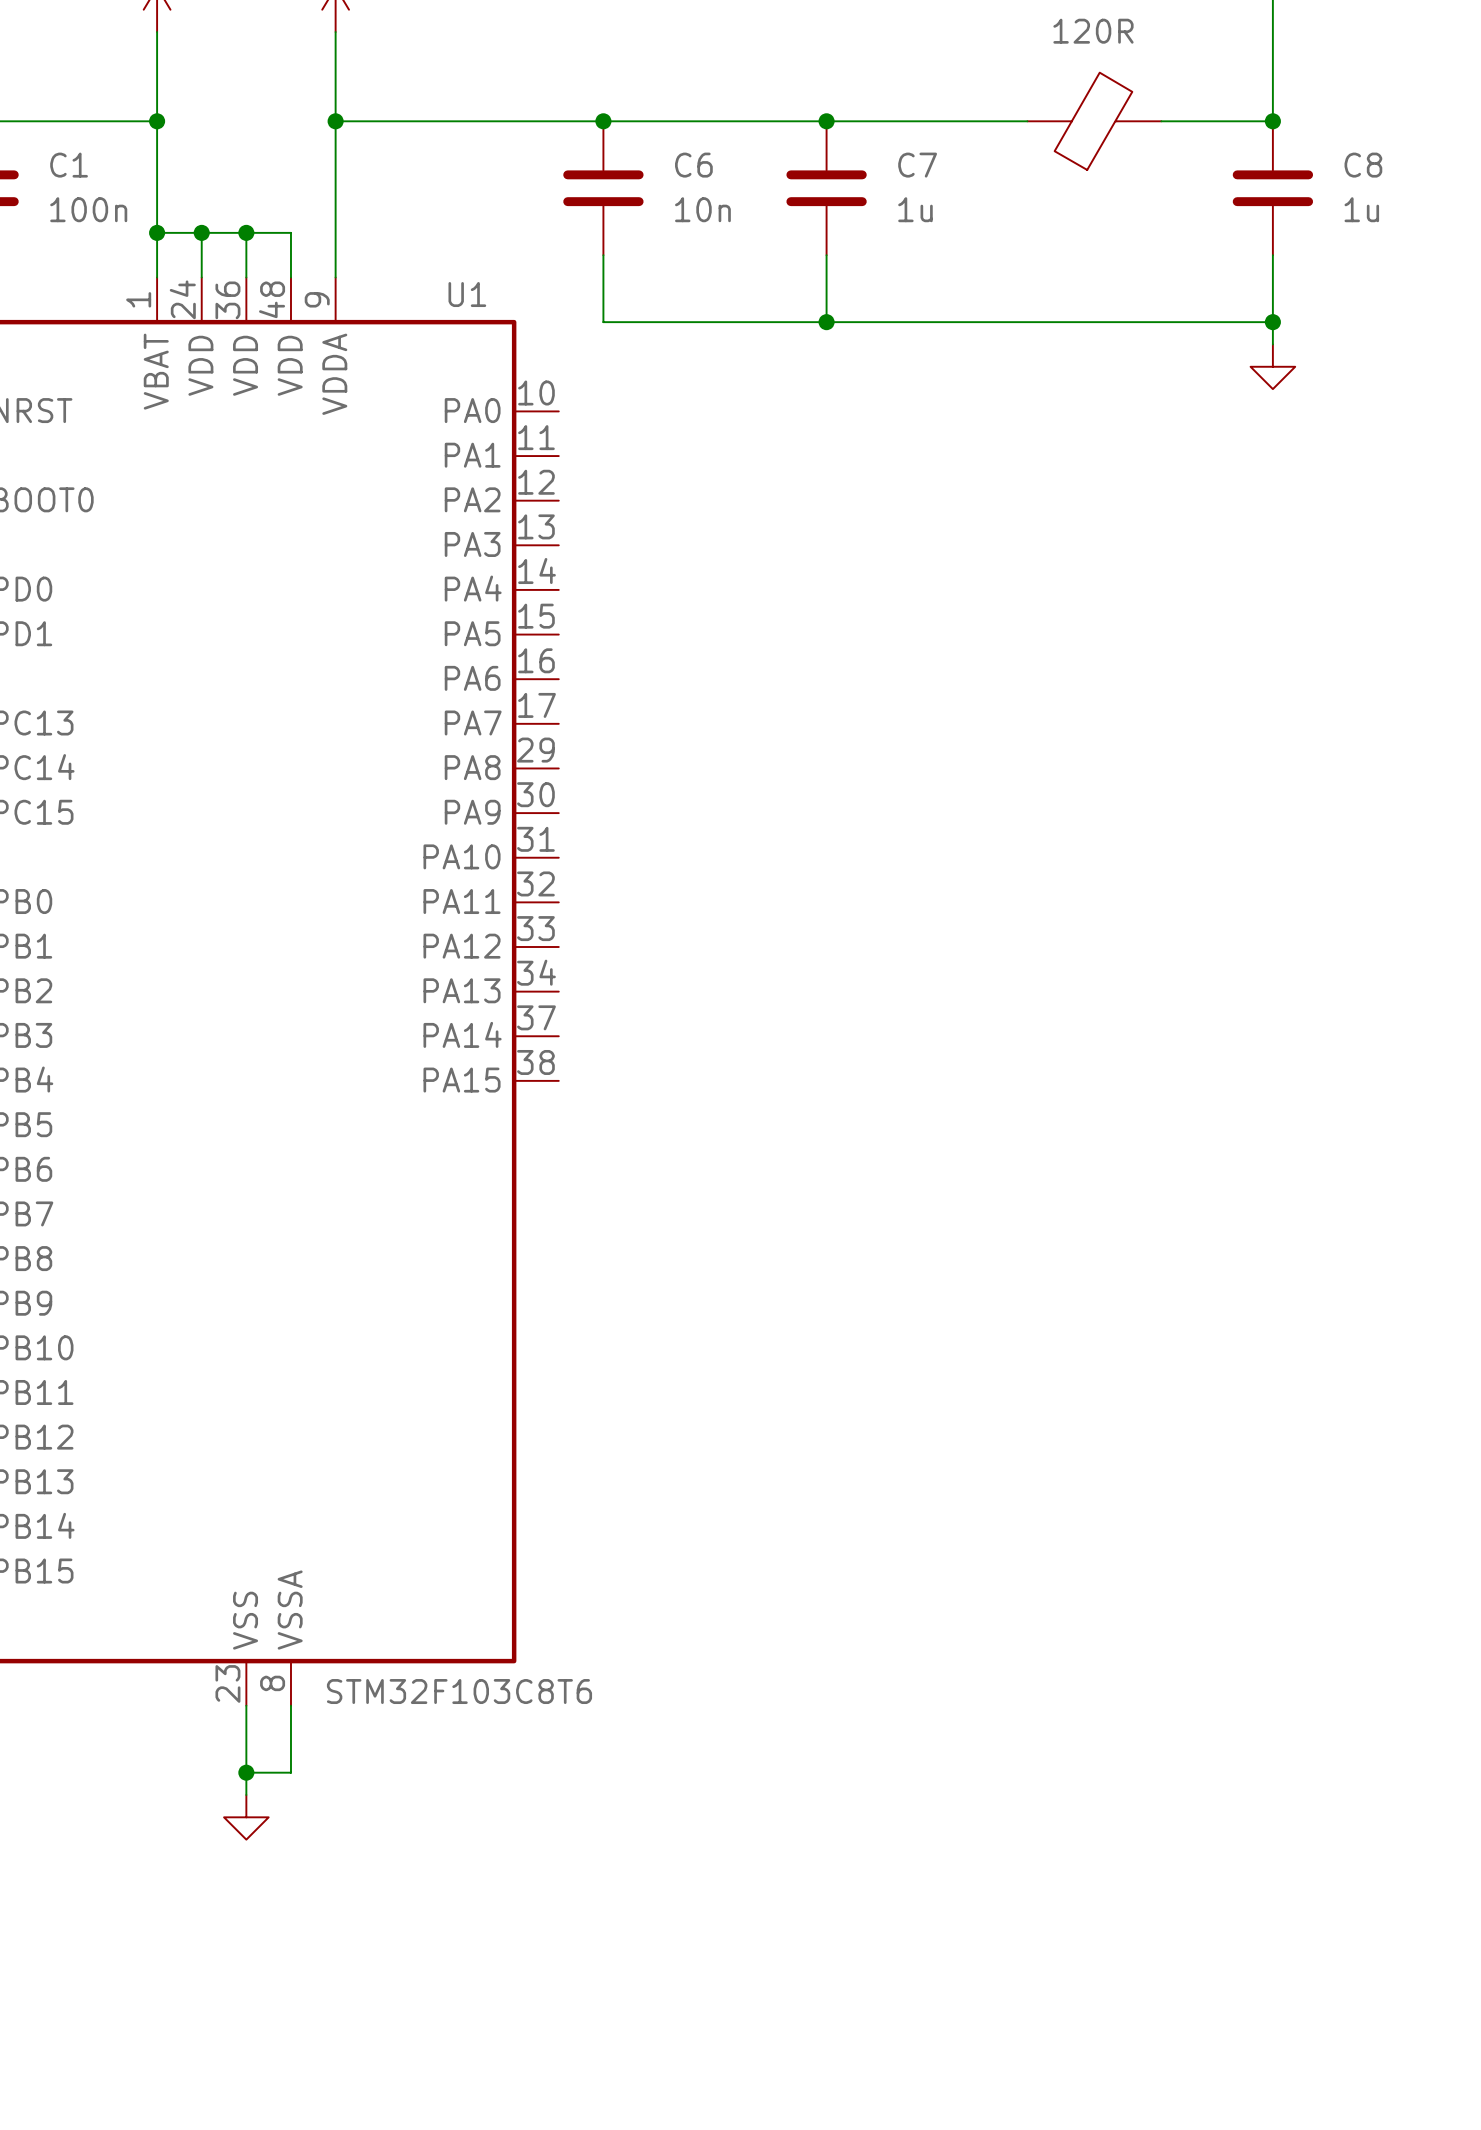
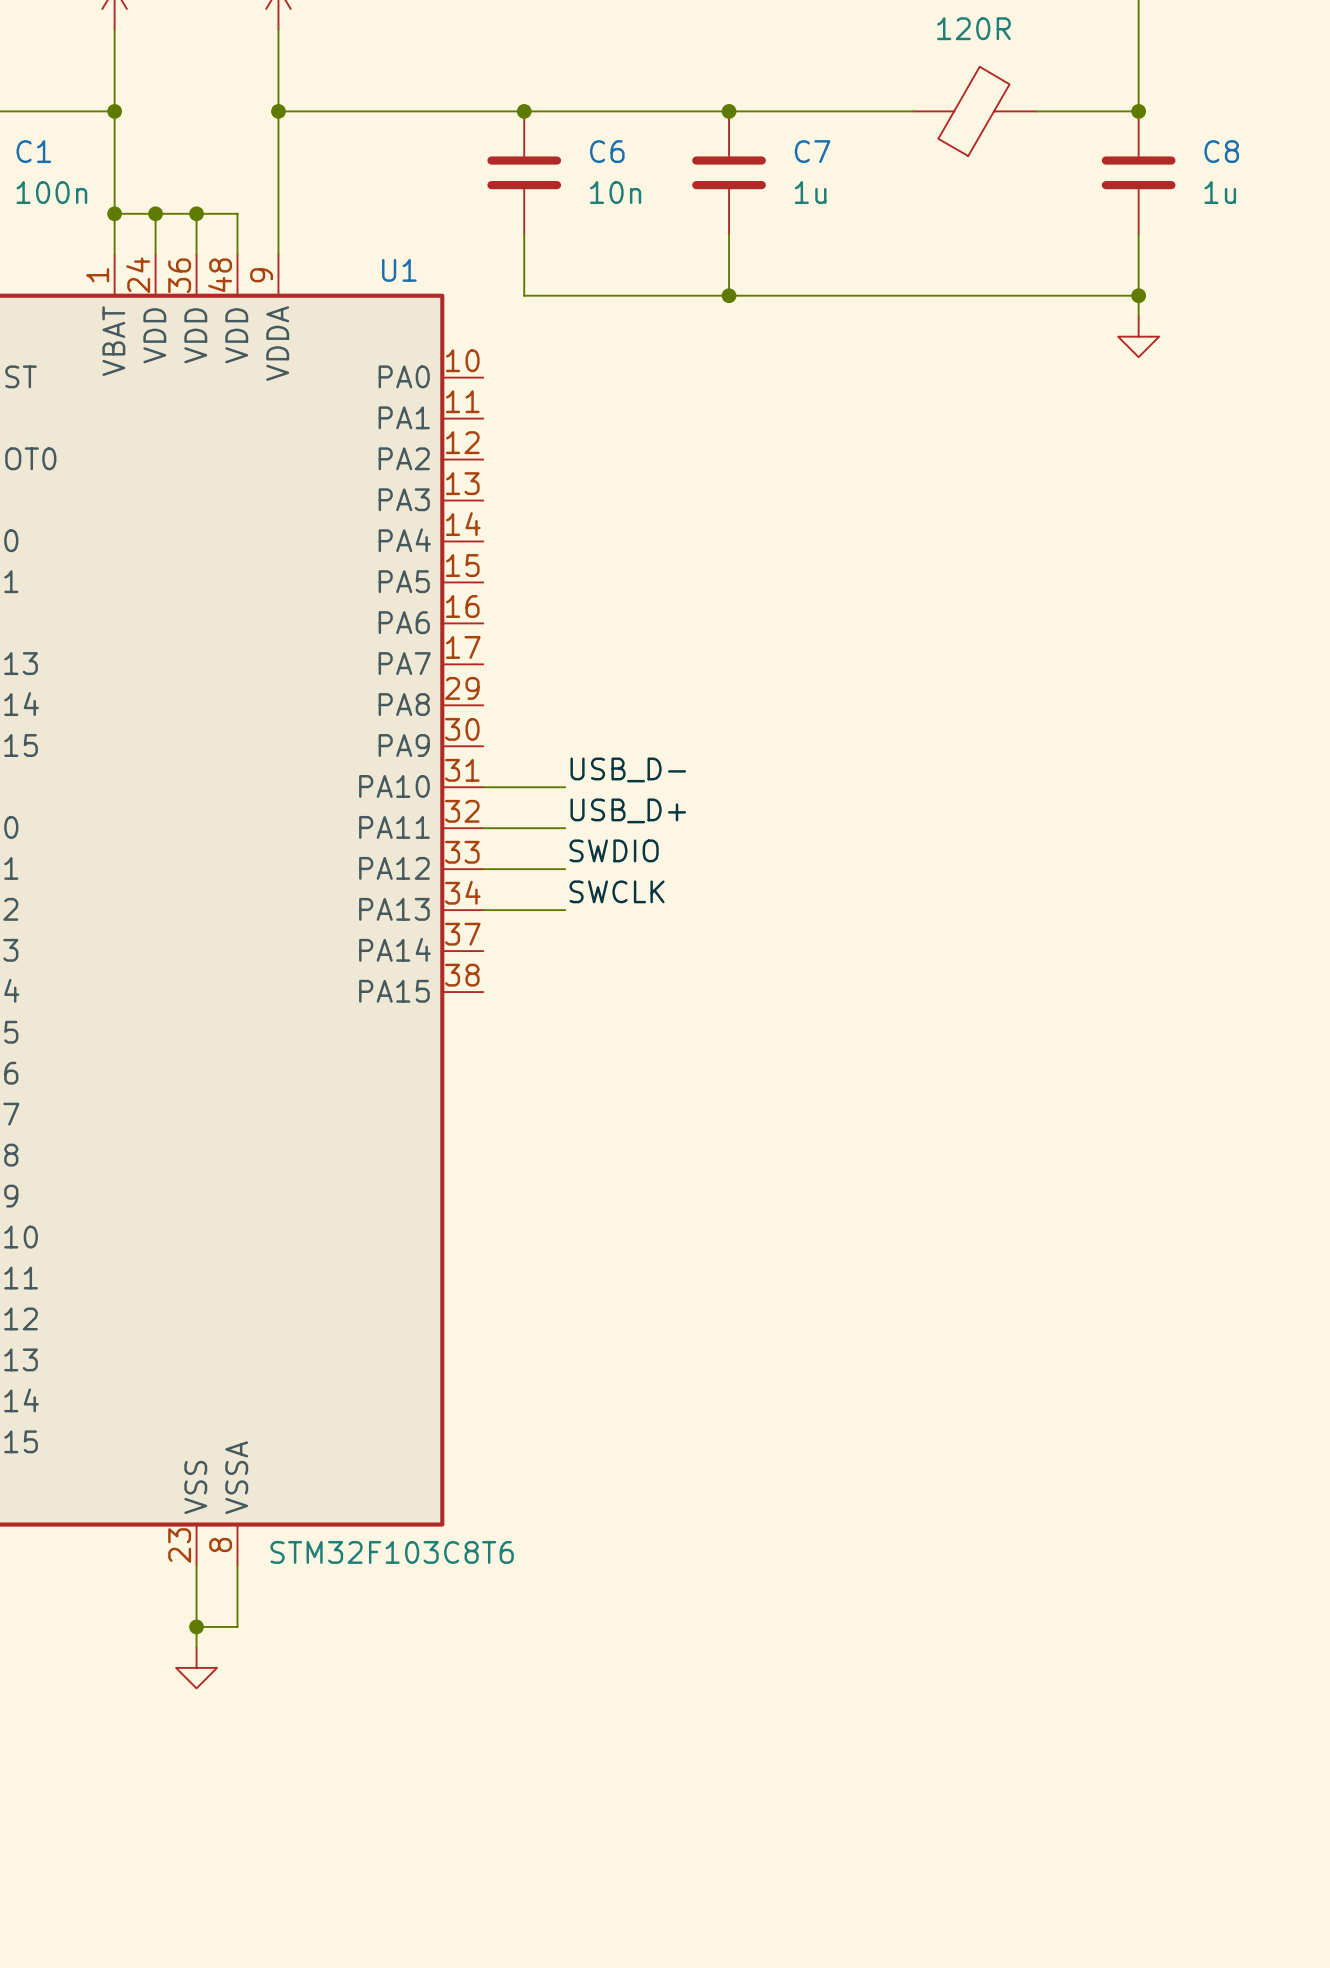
label: none -> USB_D- (628, 769)
wire: none -> (483, 787) (565, 787)
label: none -> USB_D+ (628, 810)
wire: none -> (483, 828) (565, 828)
label: none -> SWDIO (614, 850)
wire: none -> (483, 869) (565, 869)
label: none -> SWCLK (617, 891)
wire: none -> (483, 910) (565, 910)

